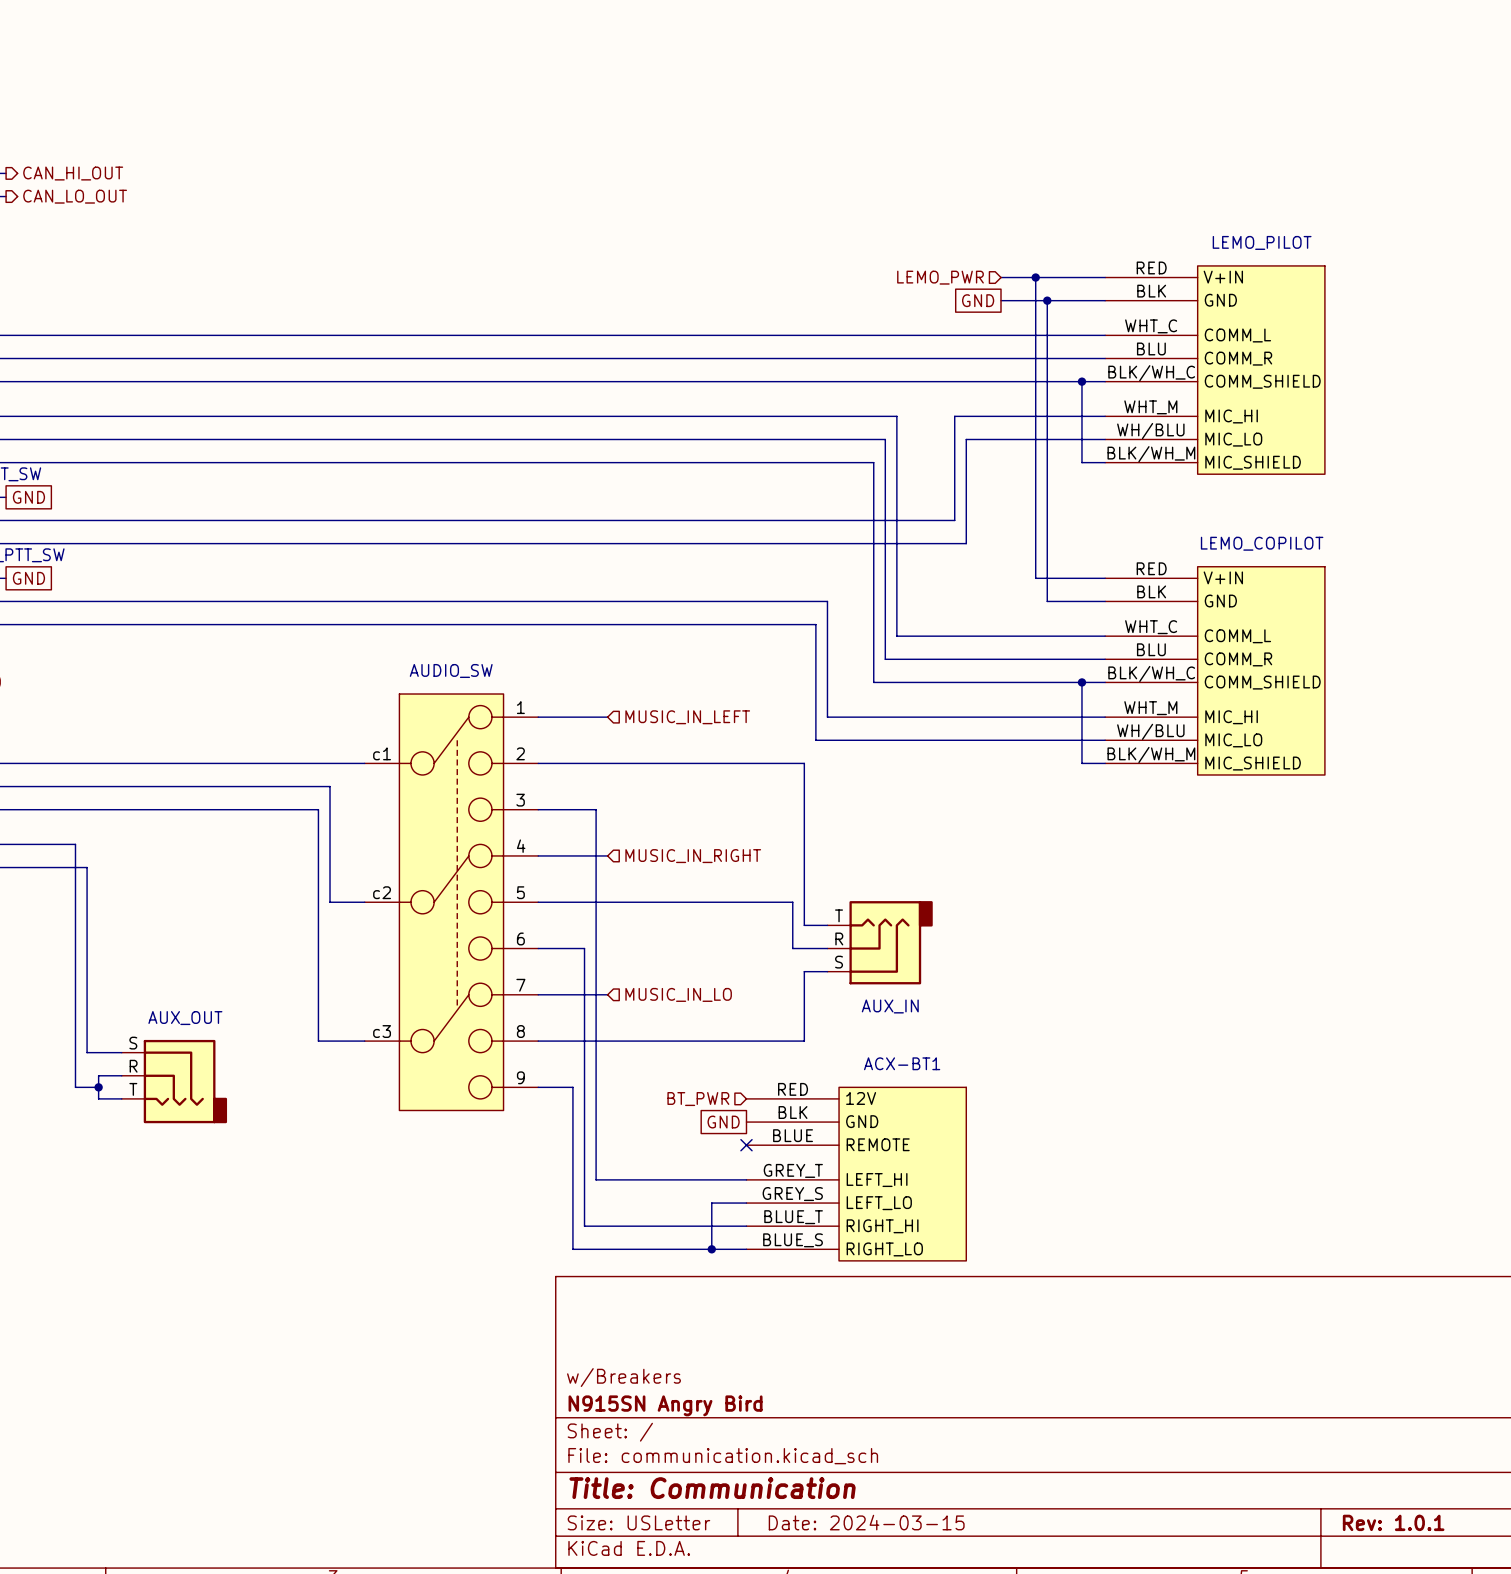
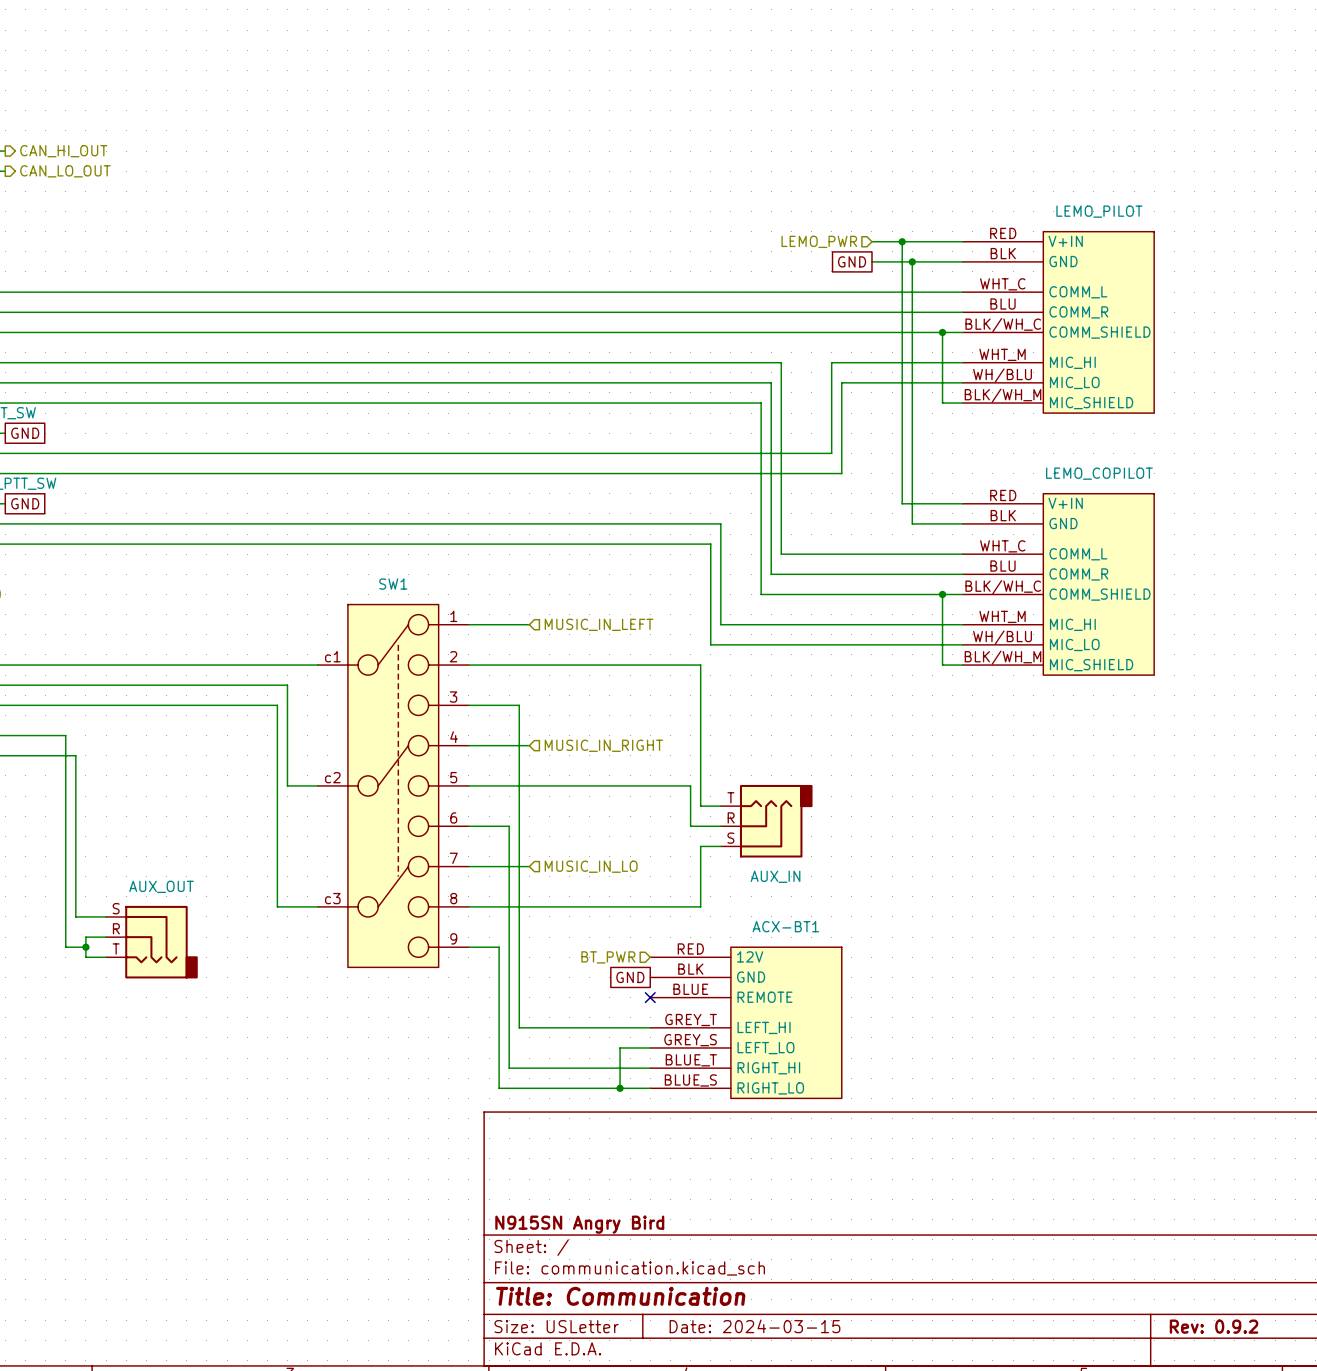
AUDIO_SW name: AUDIO_SW (451, 670) -> SW1 (393, 584)
title block: w/Breakers (623, 1377) -> none
title block: Rev: 1.0.1 (1393, 1522) -> Rev: 0.9.2 (1214, 1326)

